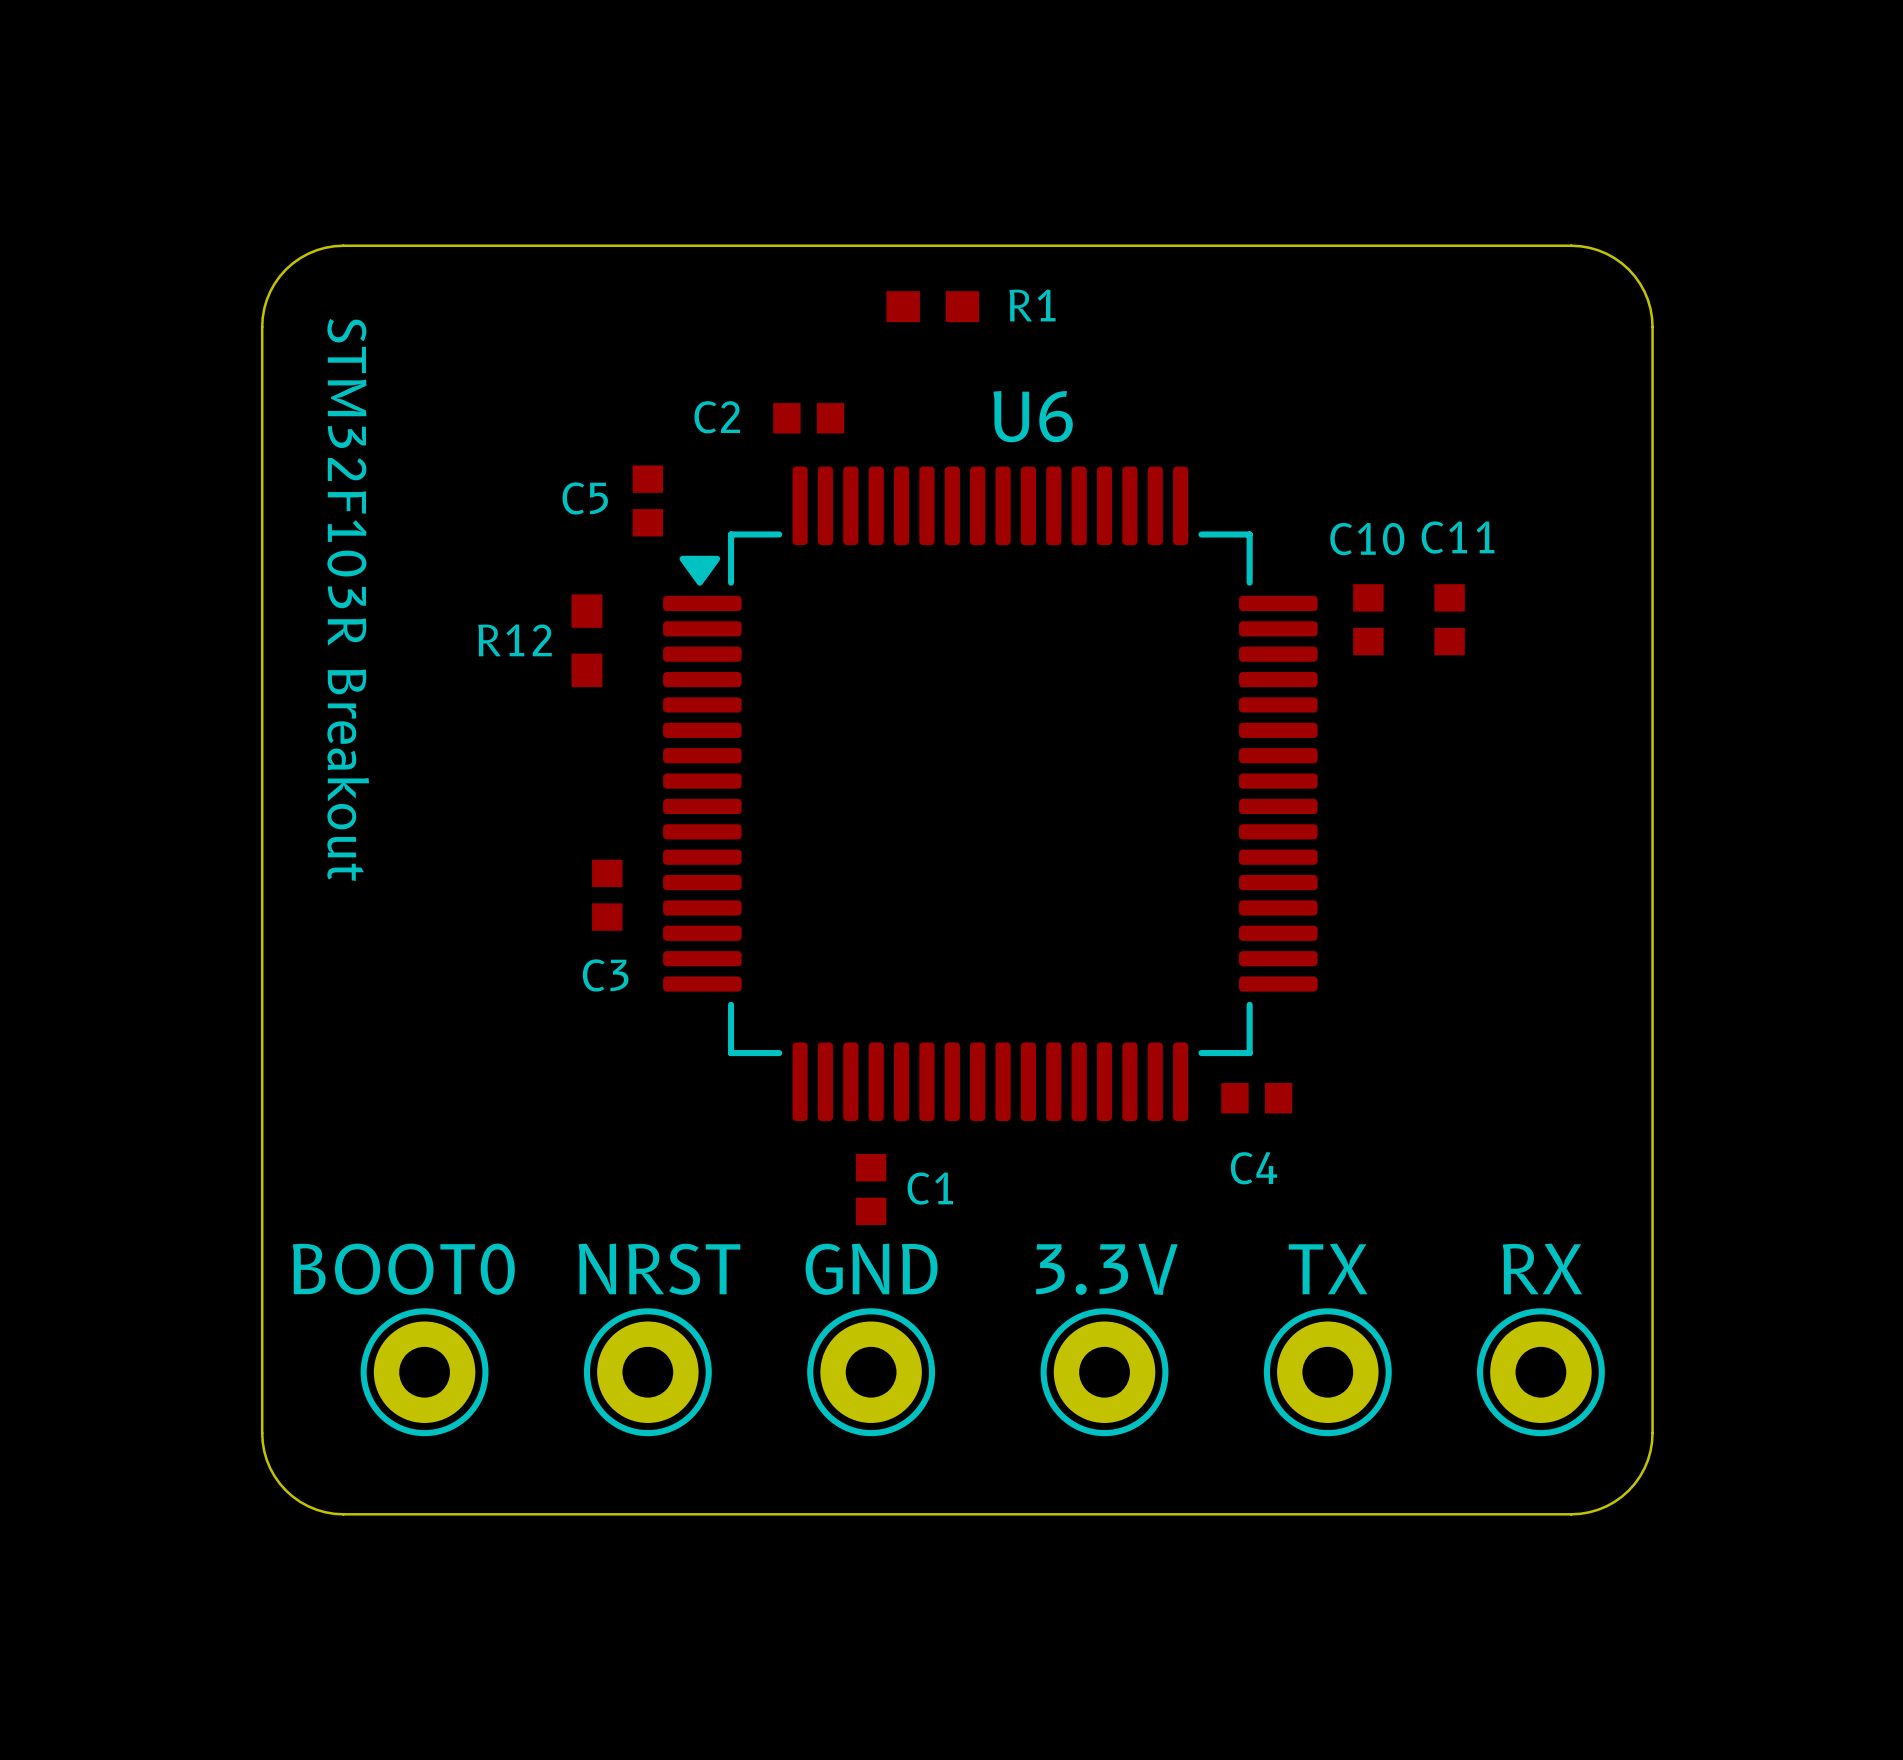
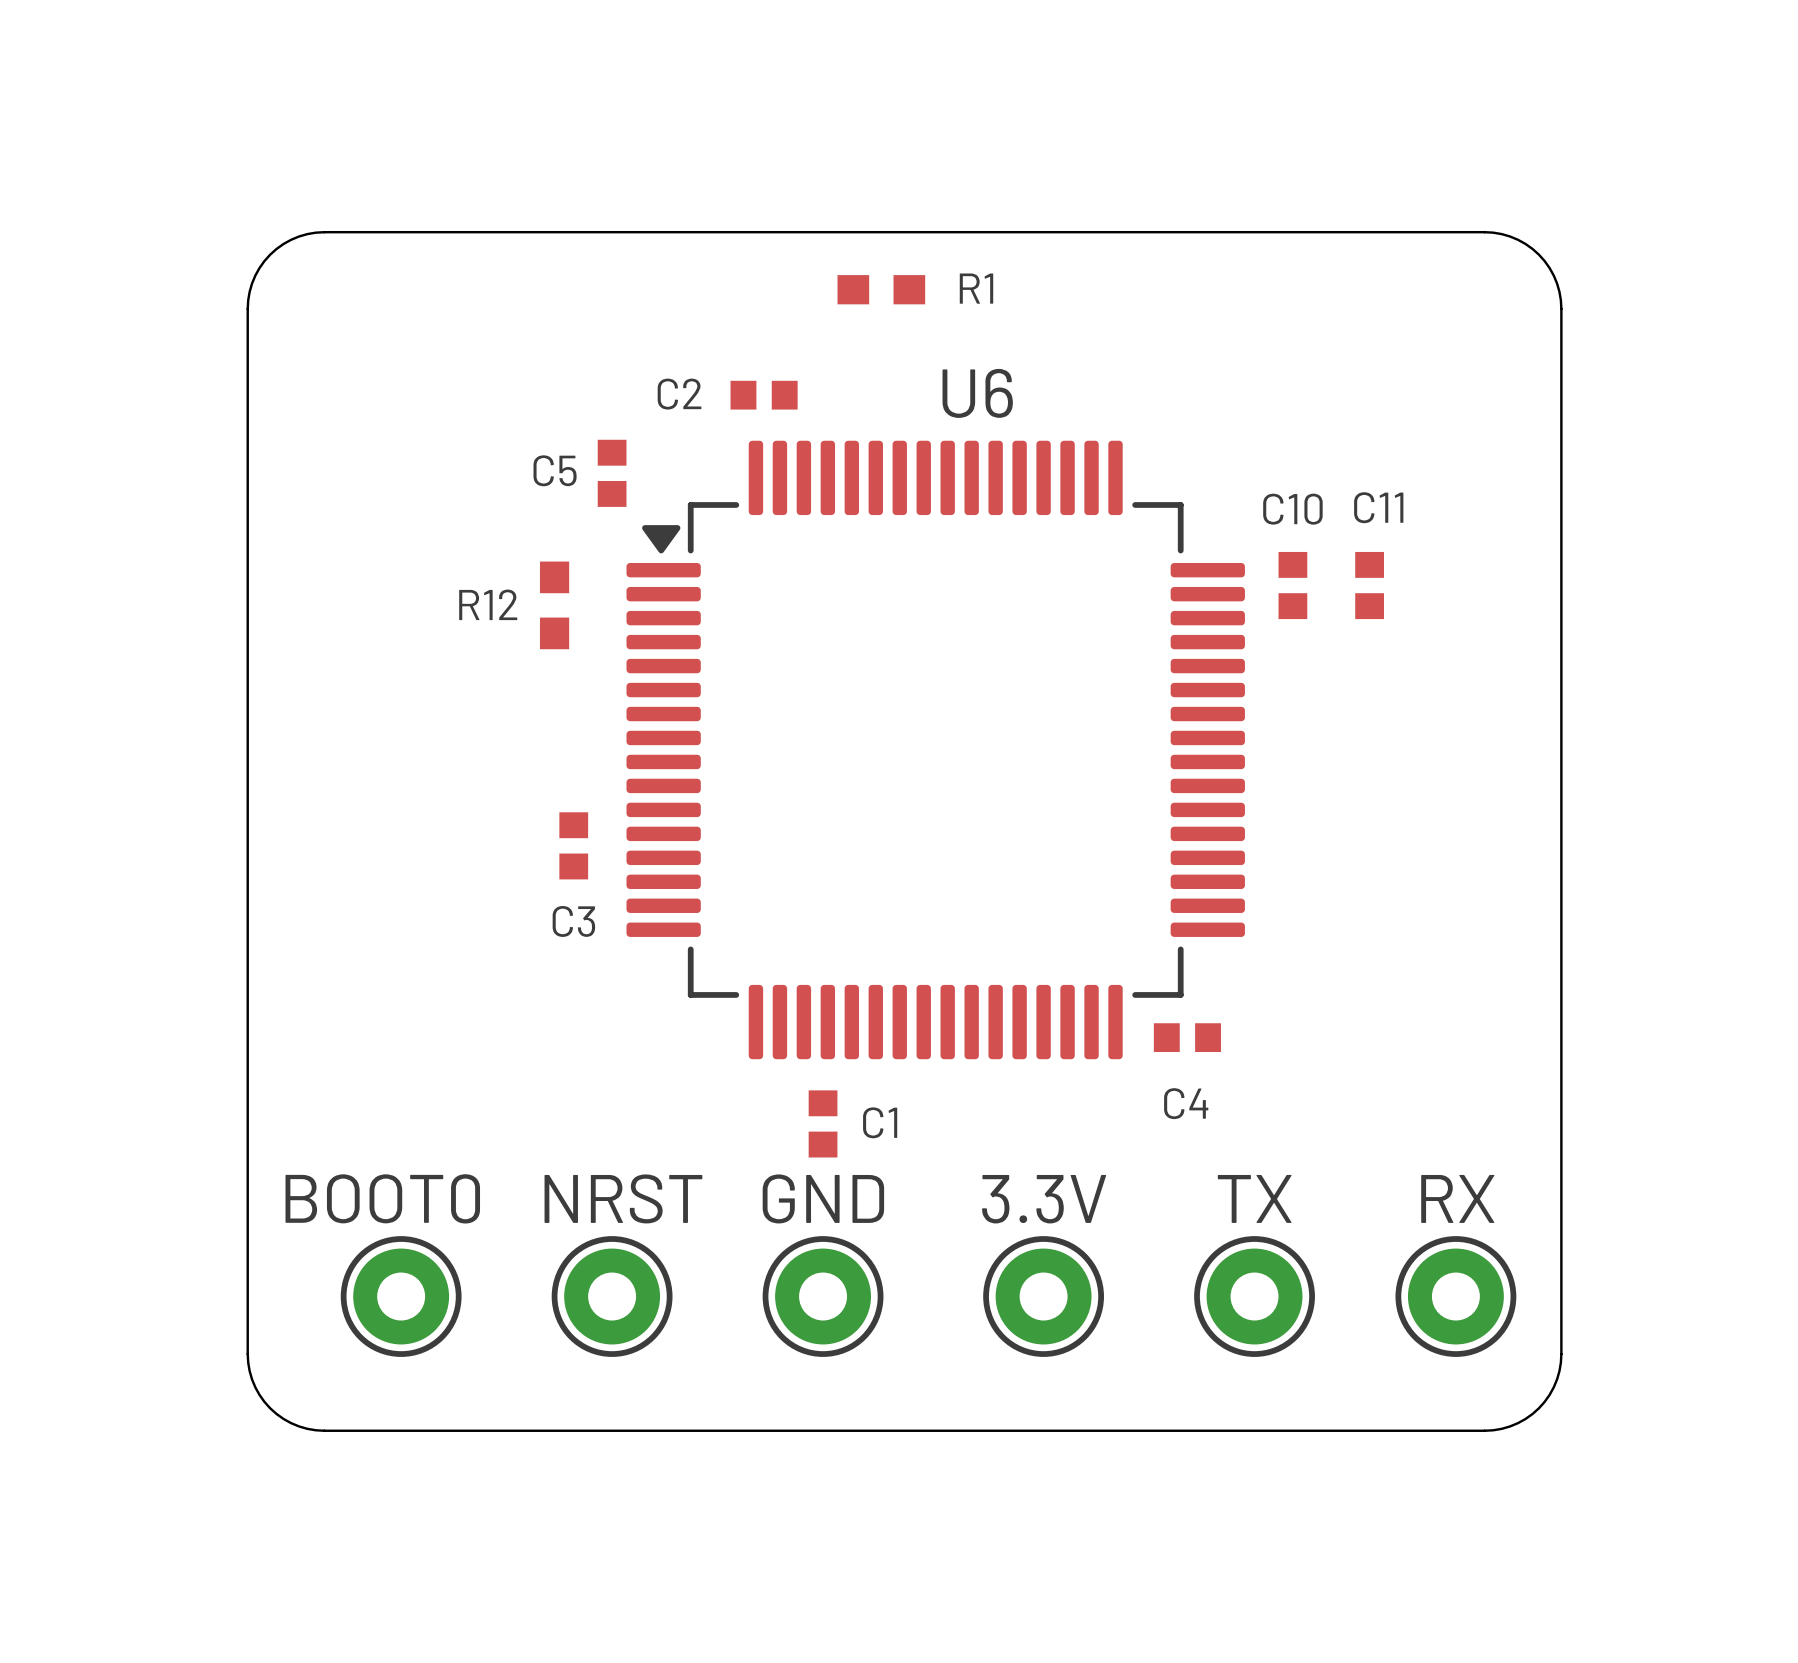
text: STM32F103R Breakout (348, 599) -> none

